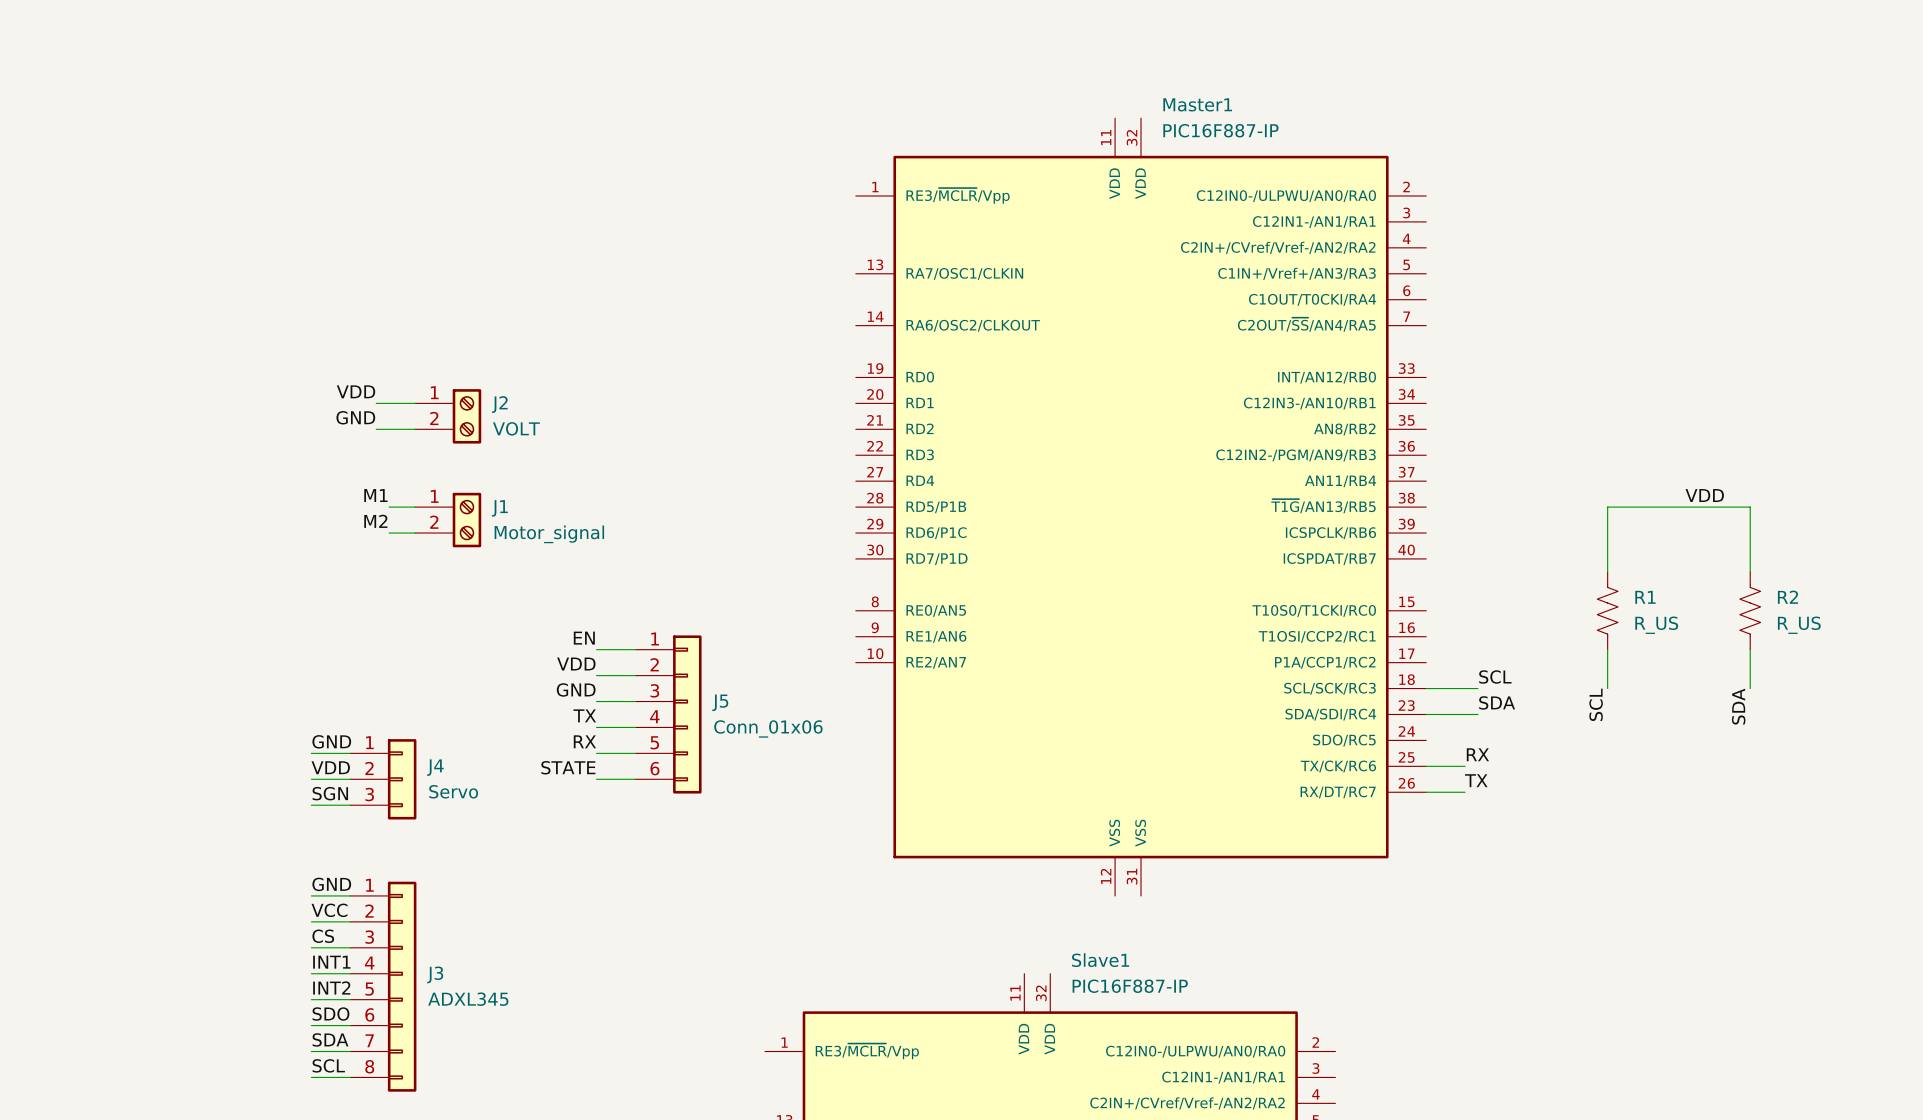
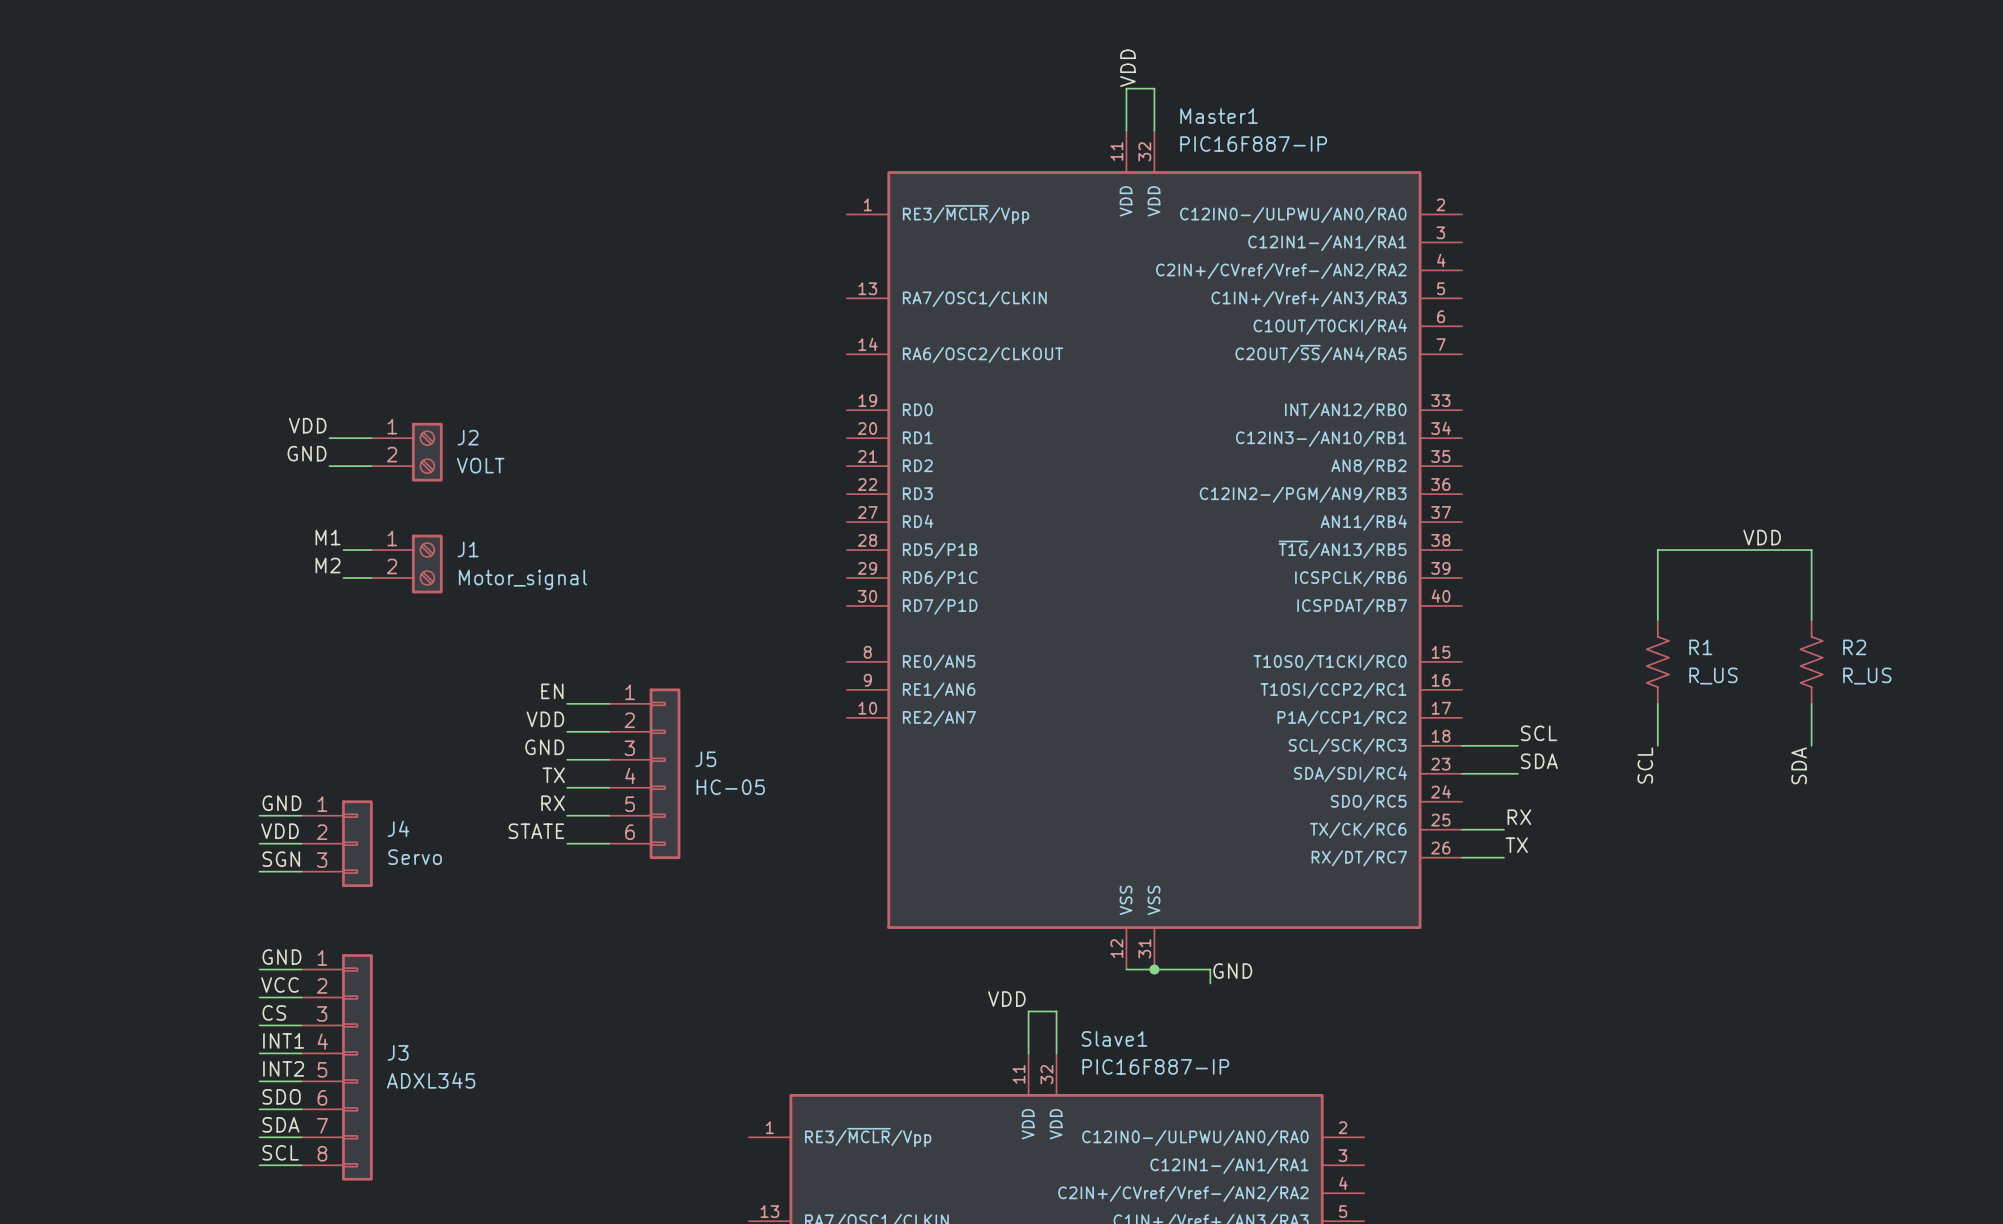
label: none -> VDD (1127, 68)
wire: none -> (1126, 130) (1126, 88) (1154, 88) (1154, 130)
J5 value: Conn_01x06 (768, 728) -> HC-05 (730, 787)
wire: none -> (1126, 969) (1210, 969) (1210, 983)
junction: none -> (1154, 969)
label: none -> GND (1232, 971)
label: none -> VDD (1006, 998)
wire: none -> (1028, 1053) (1028, 1011) (1056, 1011) (1056, 1053)

